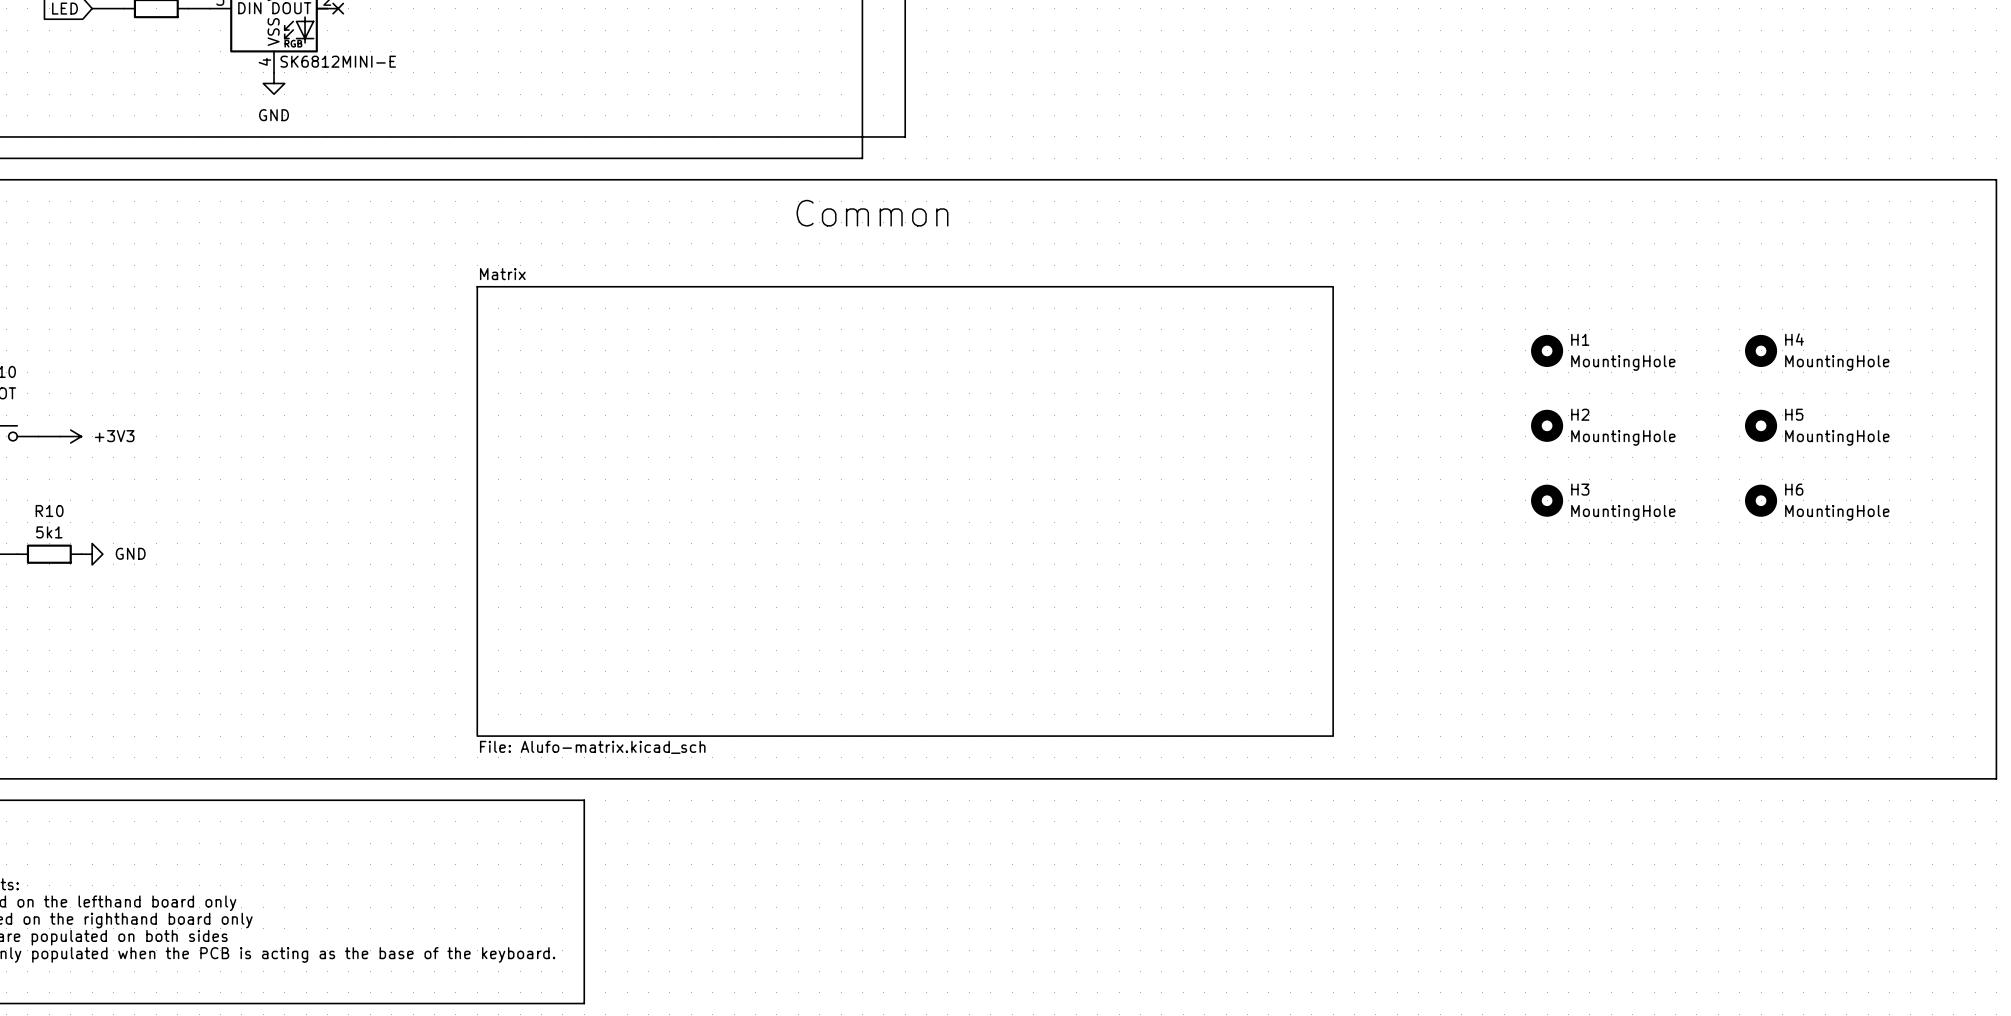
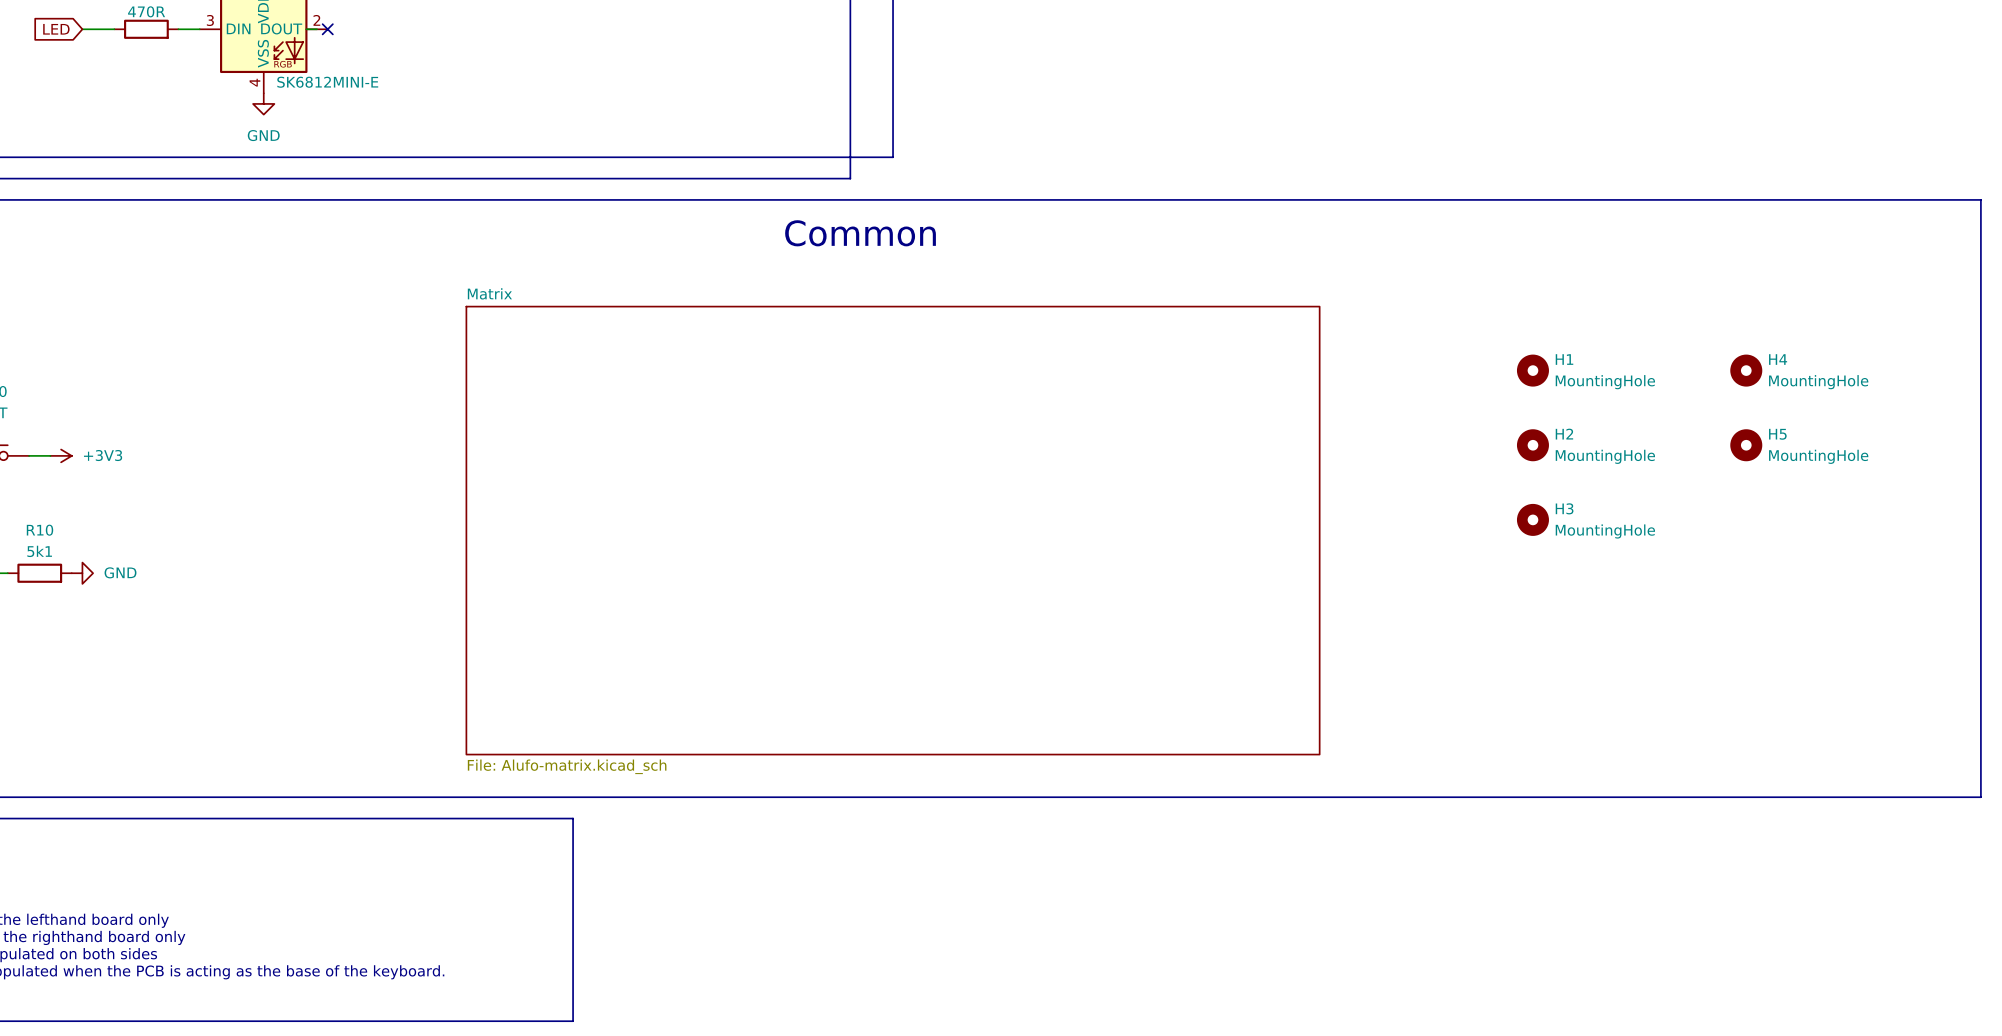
H6: MountingHole (1761, 500) -> none

